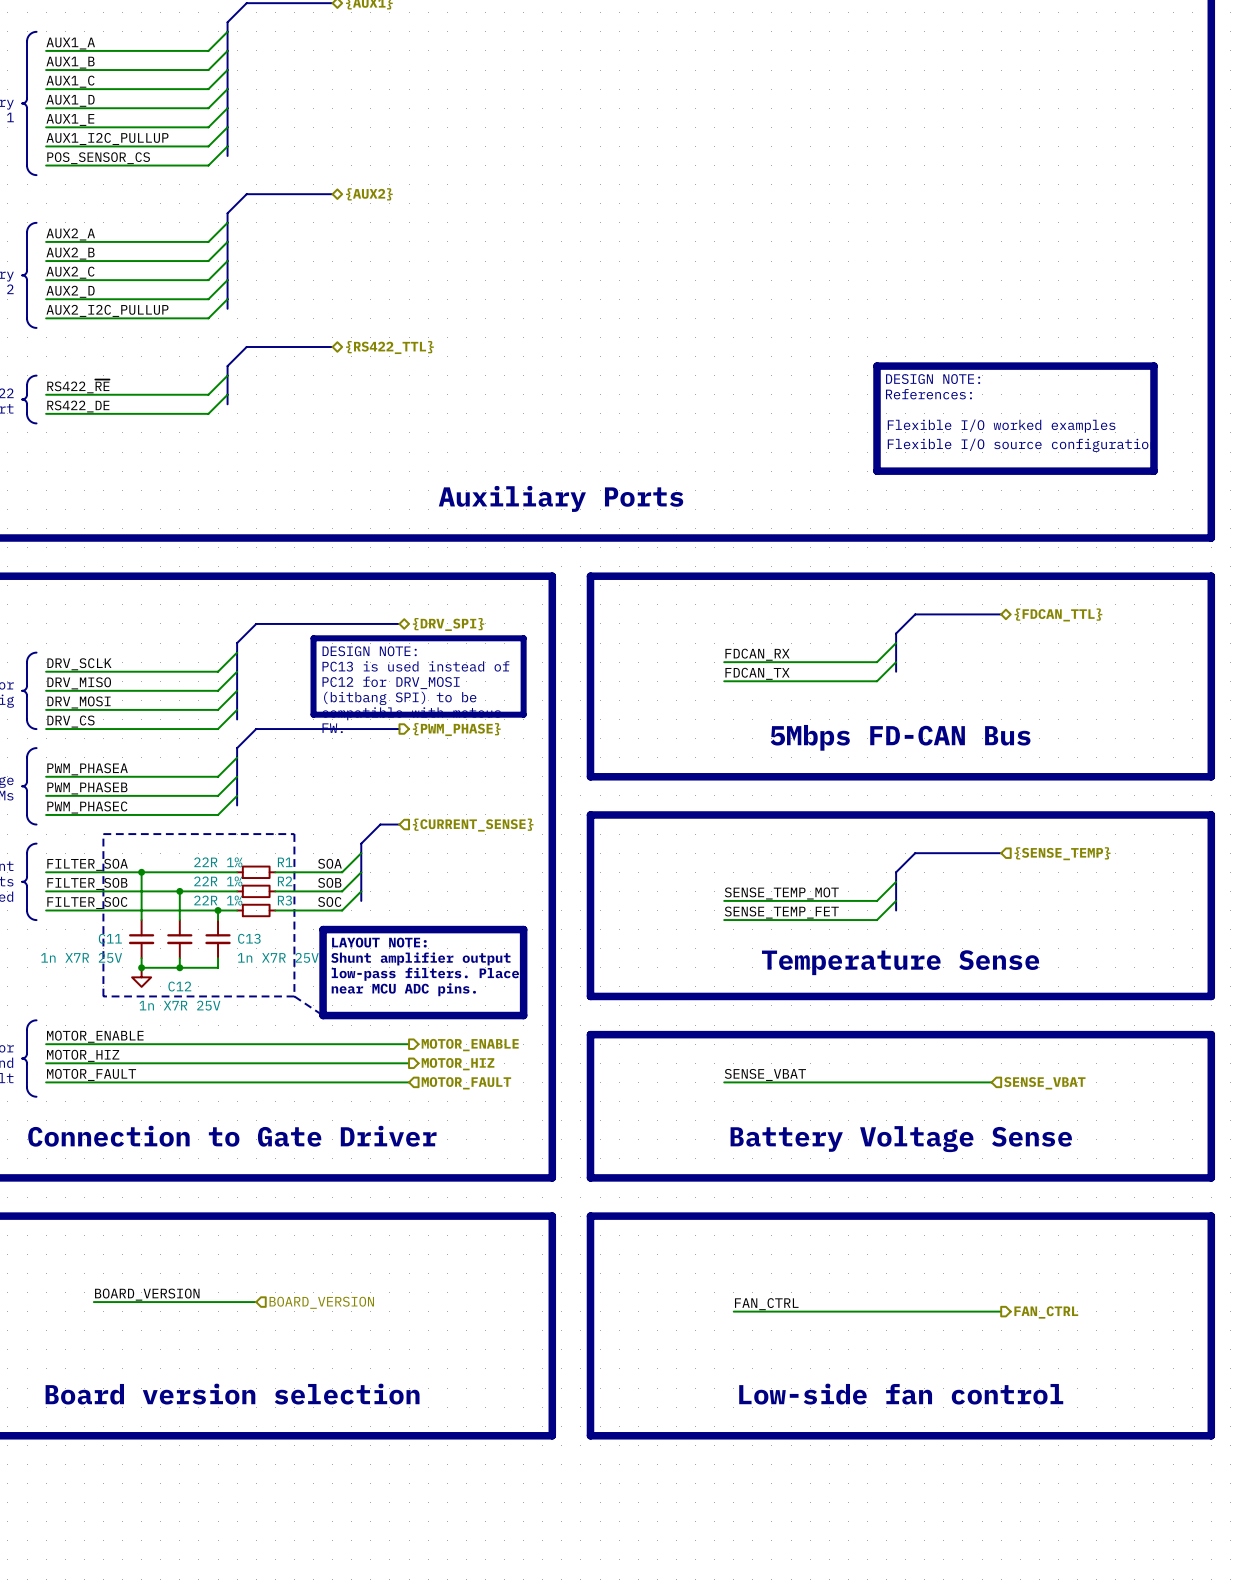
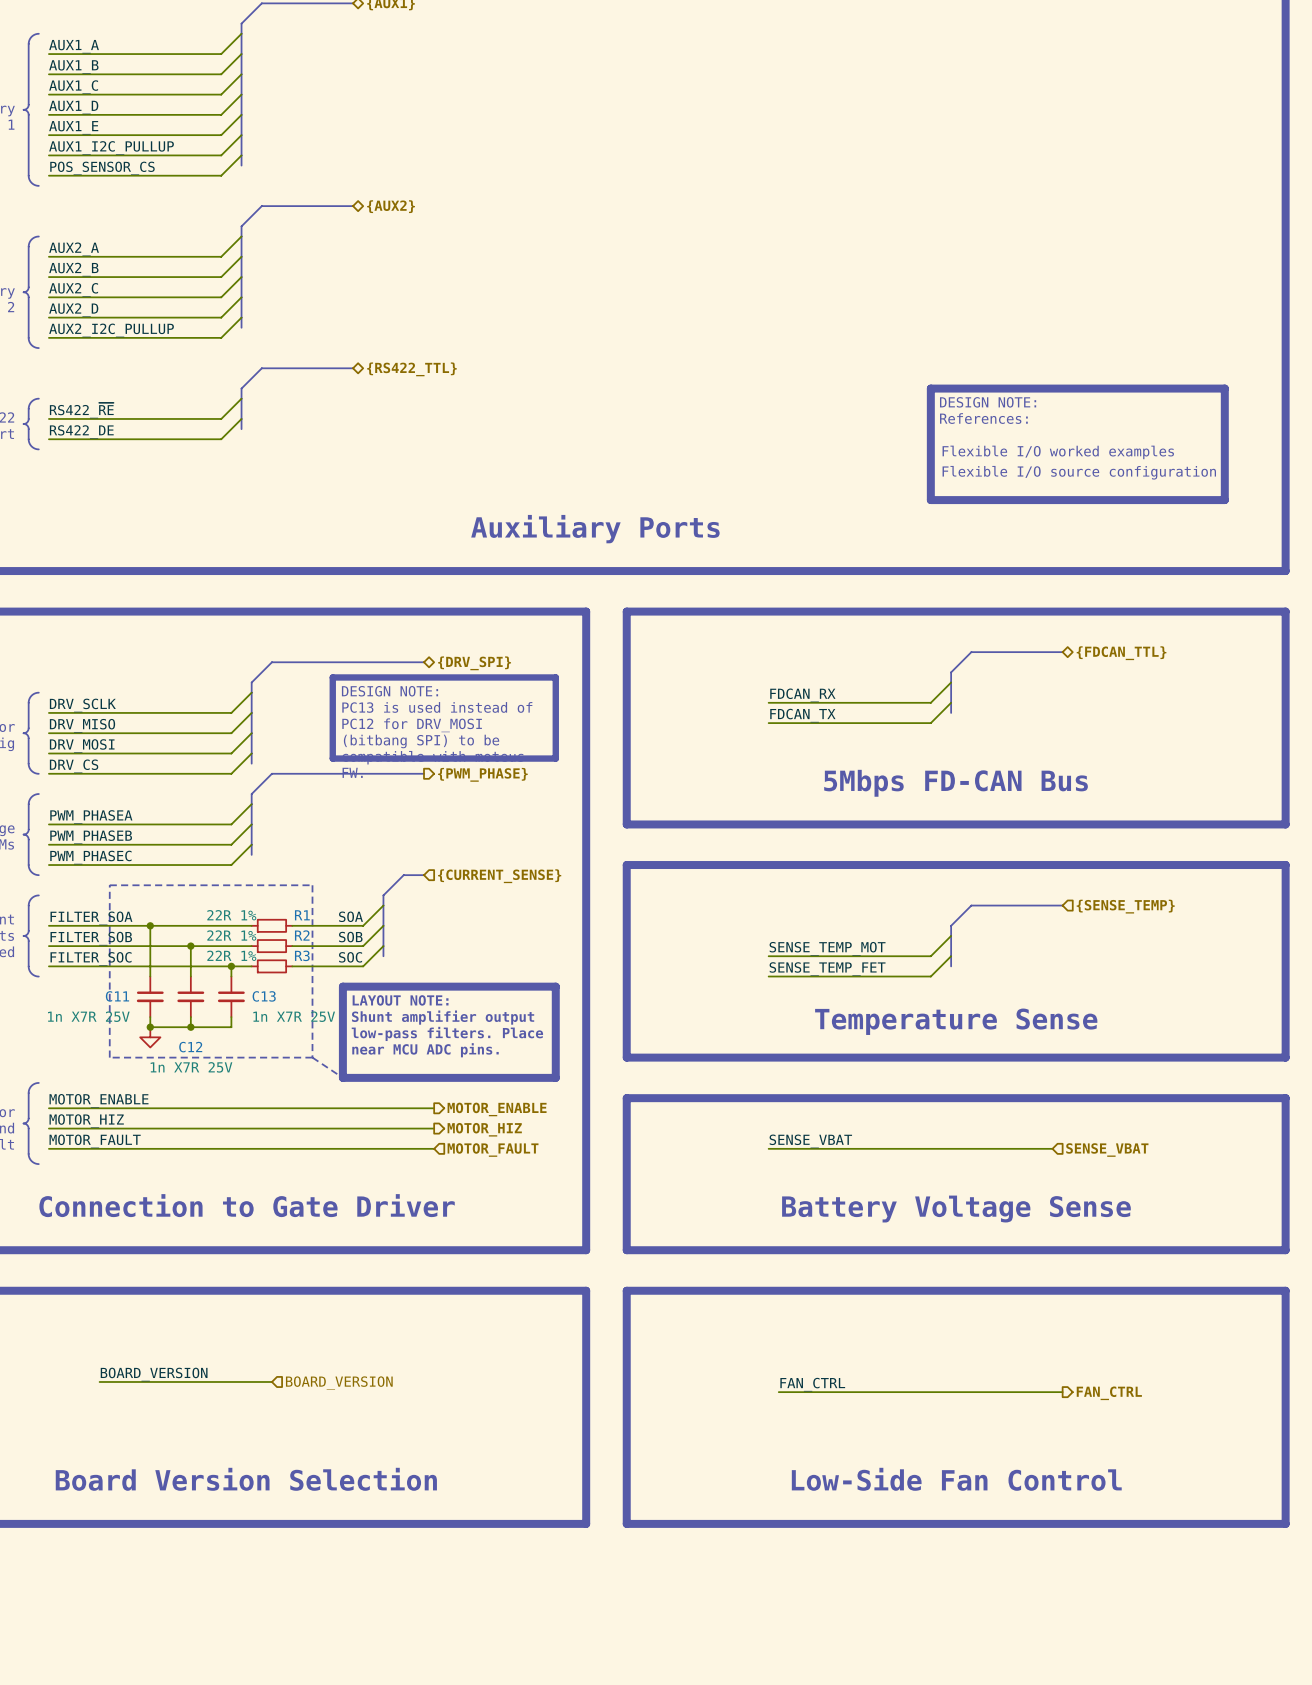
text: Board version selection (232, 1394) -> Board Version Selection (246, 1479)
text: Low-side fan control (901, 1394) -> Low-Side Fan Control (956, 1479)

